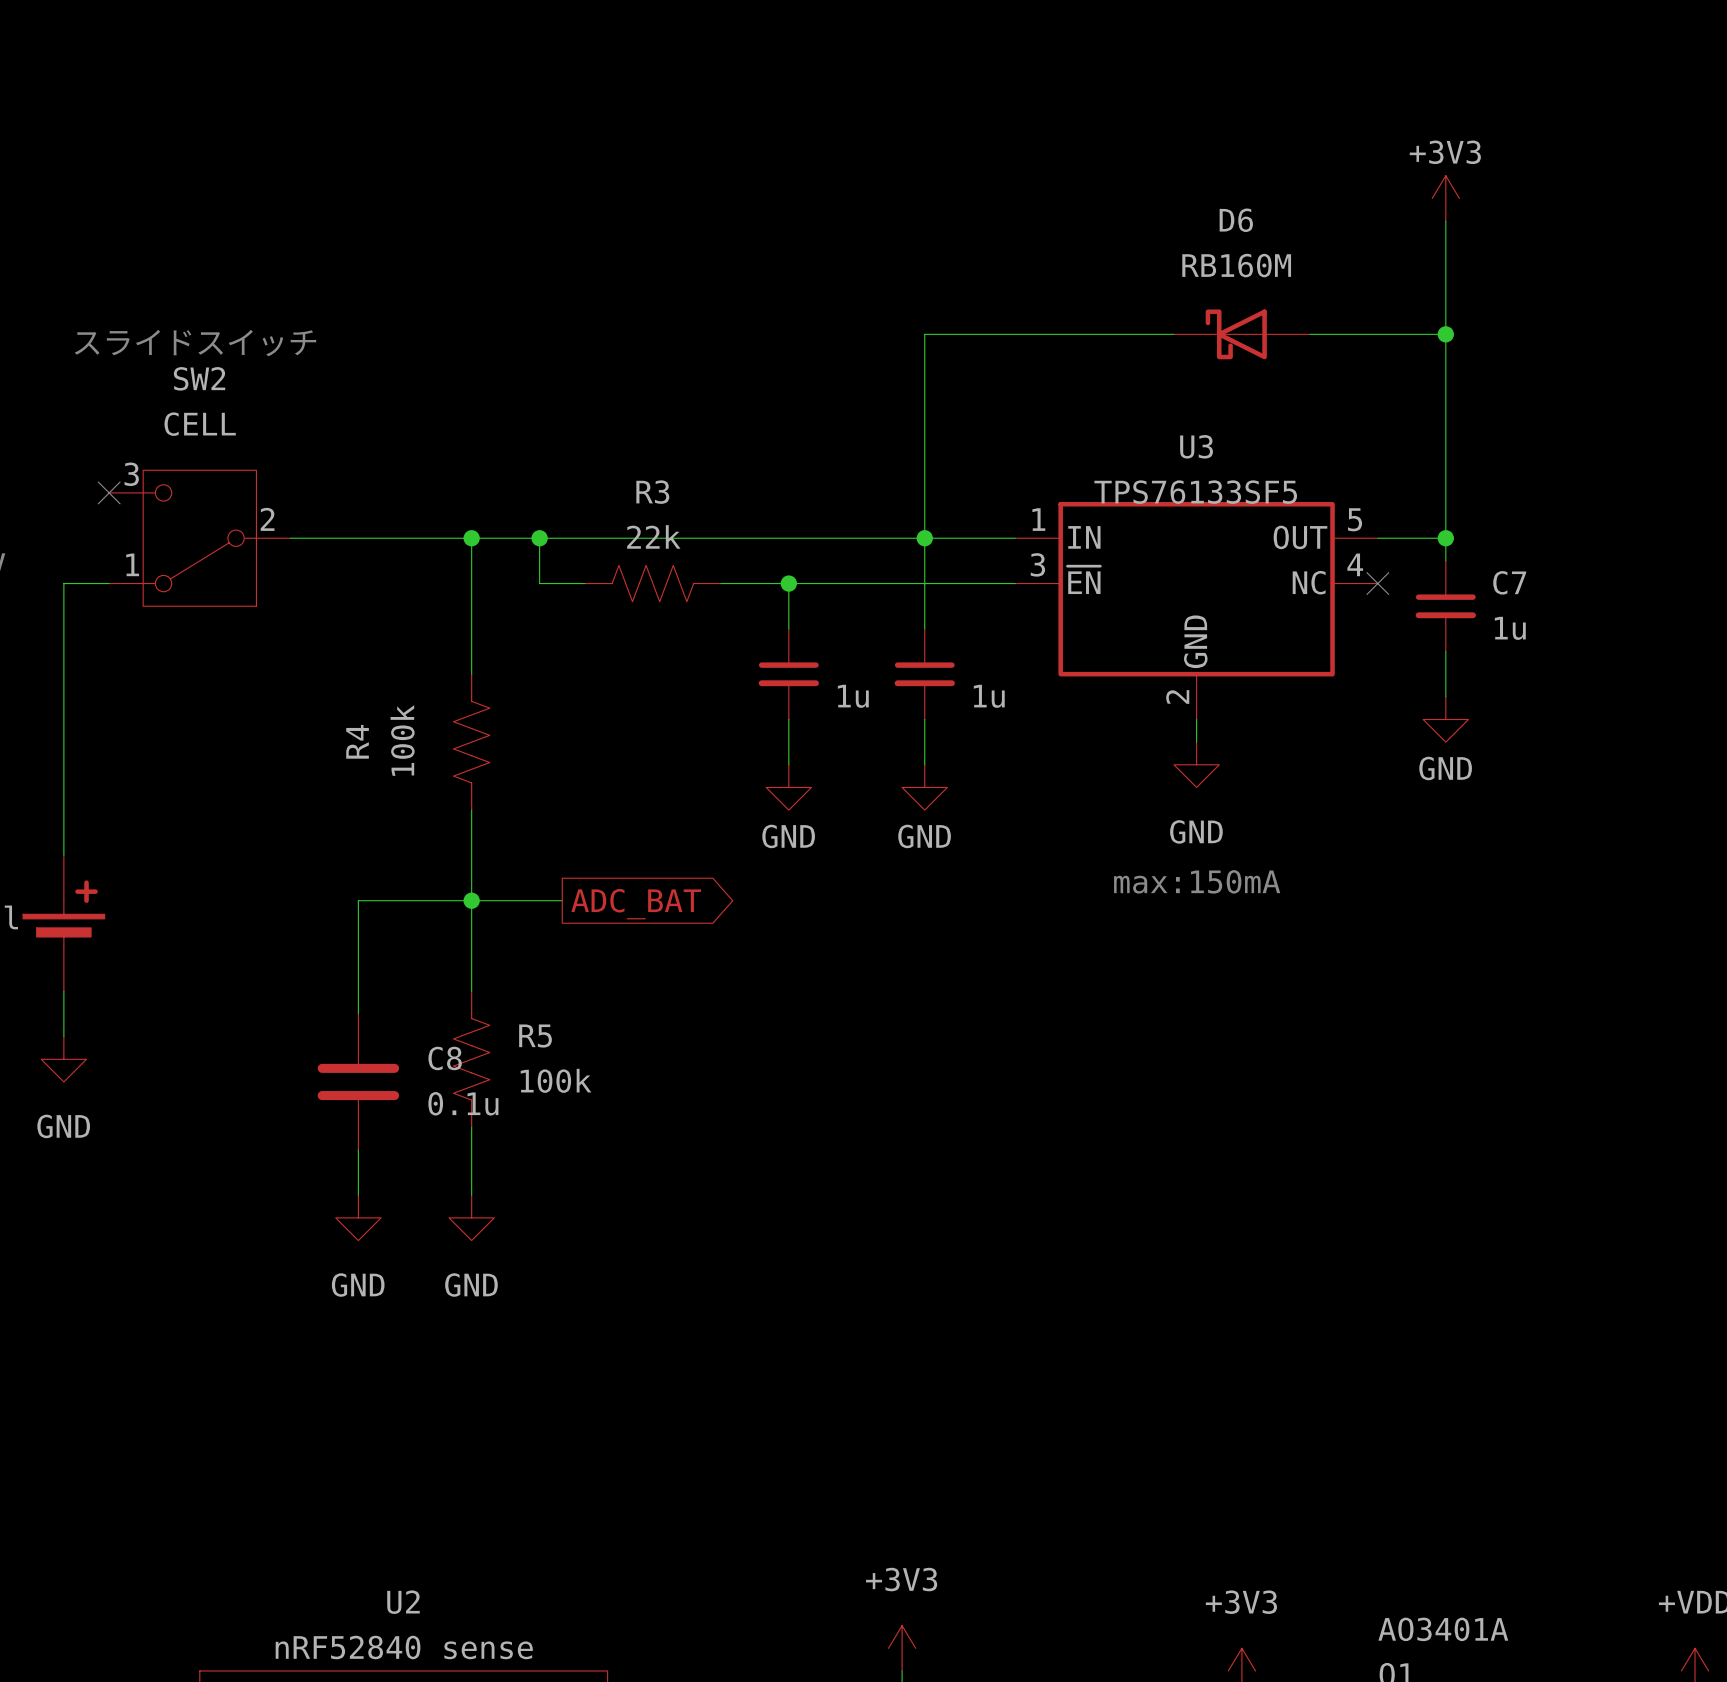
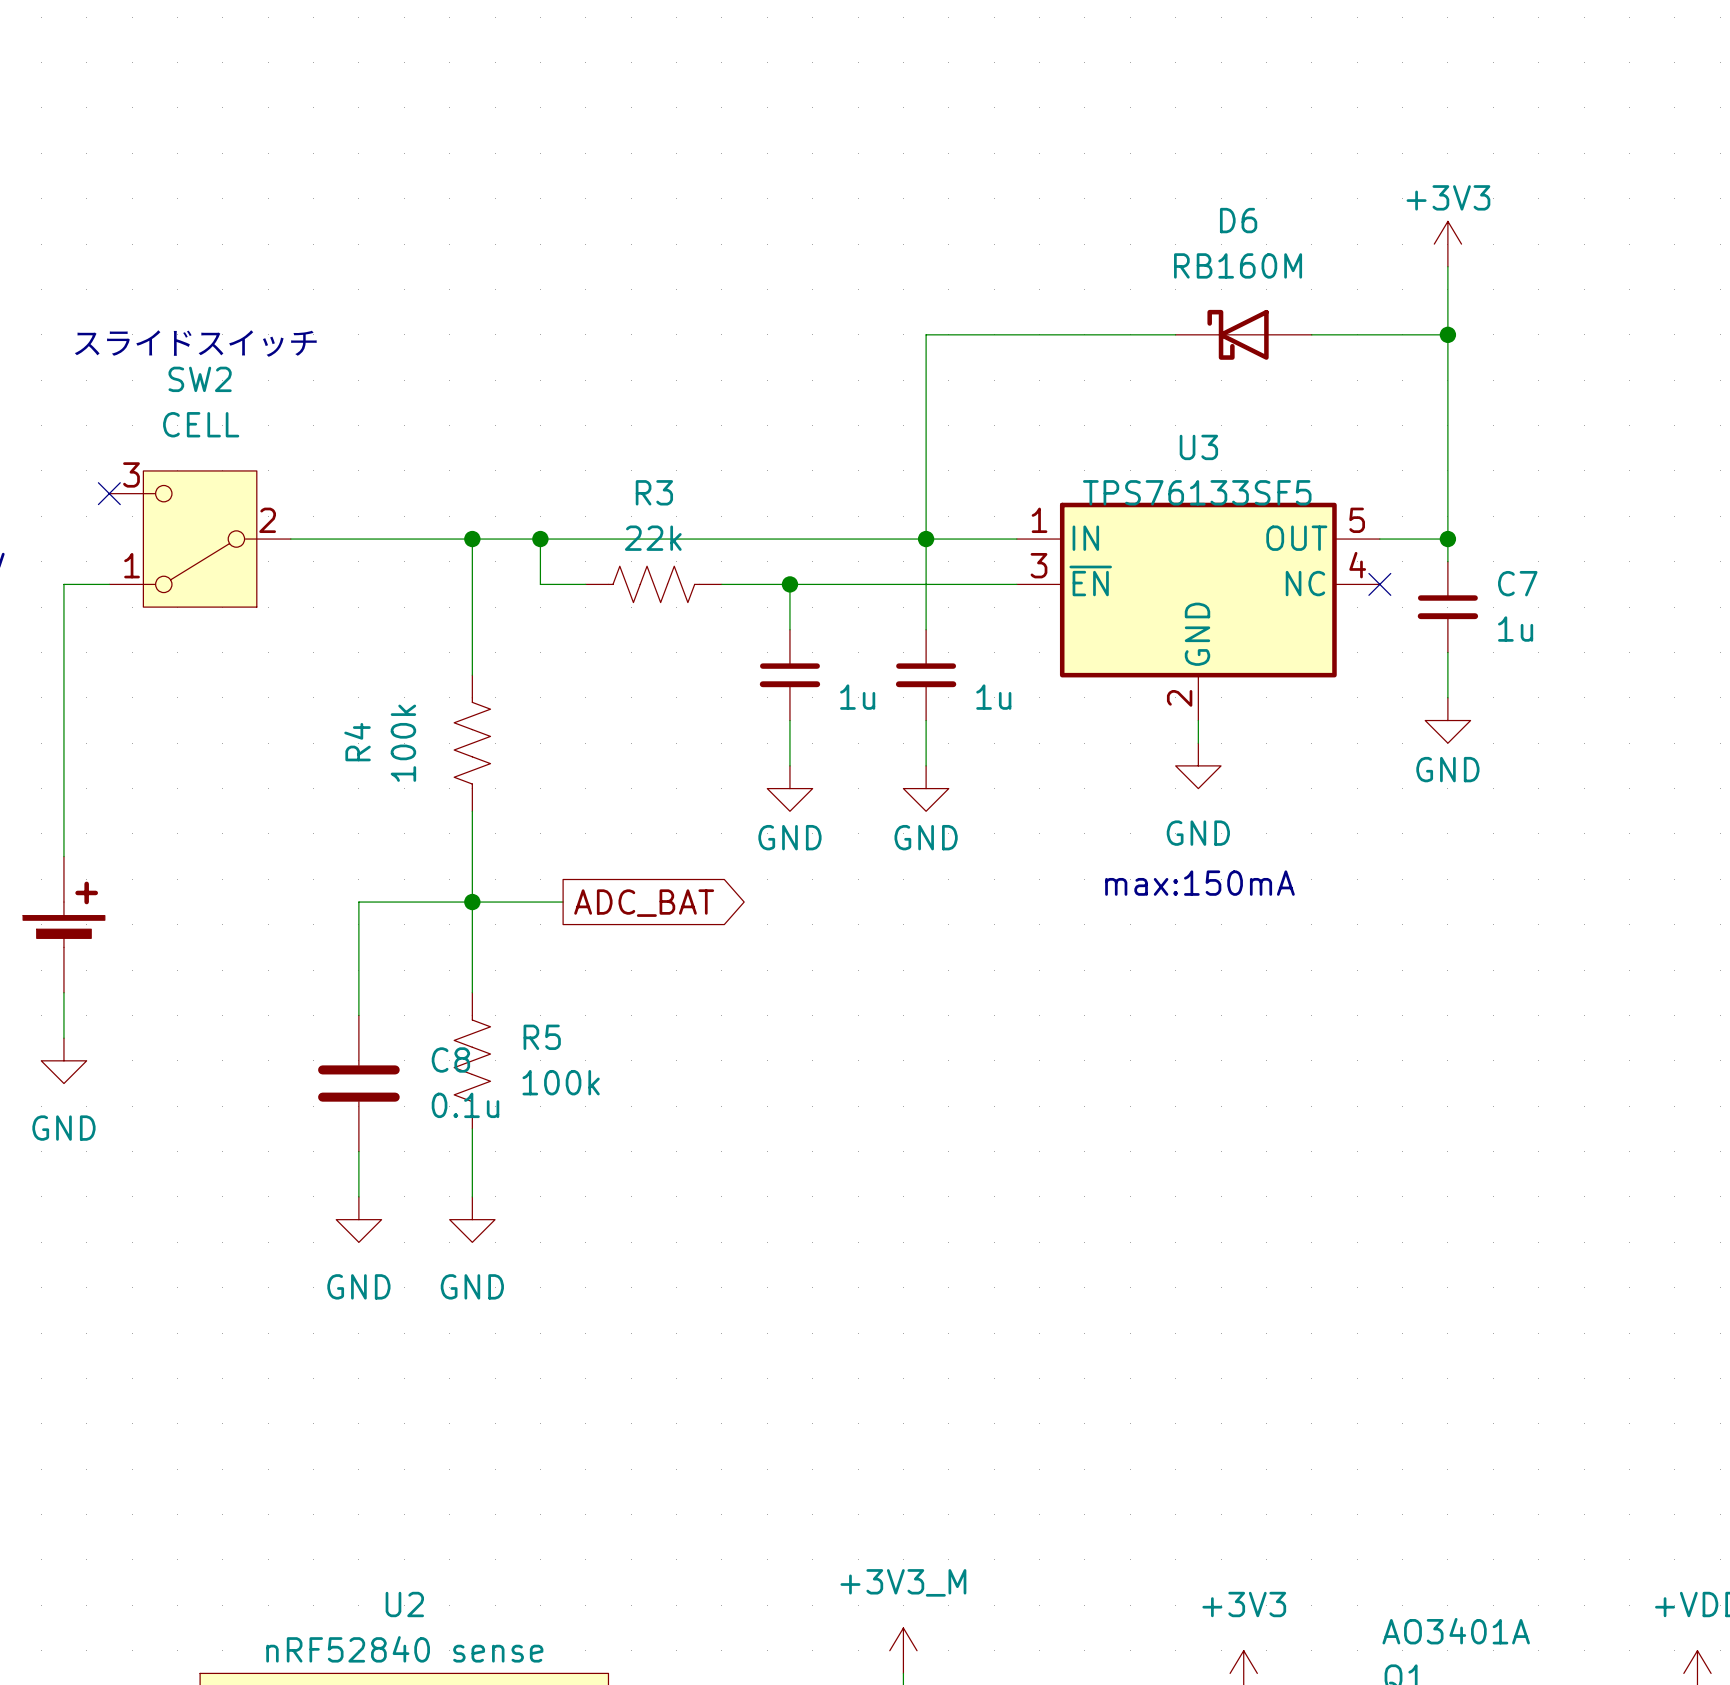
power symbol position: +3V3 (1445, 198) -> +3V3 (1447, 244)
power symbol: +3V3 (902, 1648) -> +3V3_M (903, 1650)

